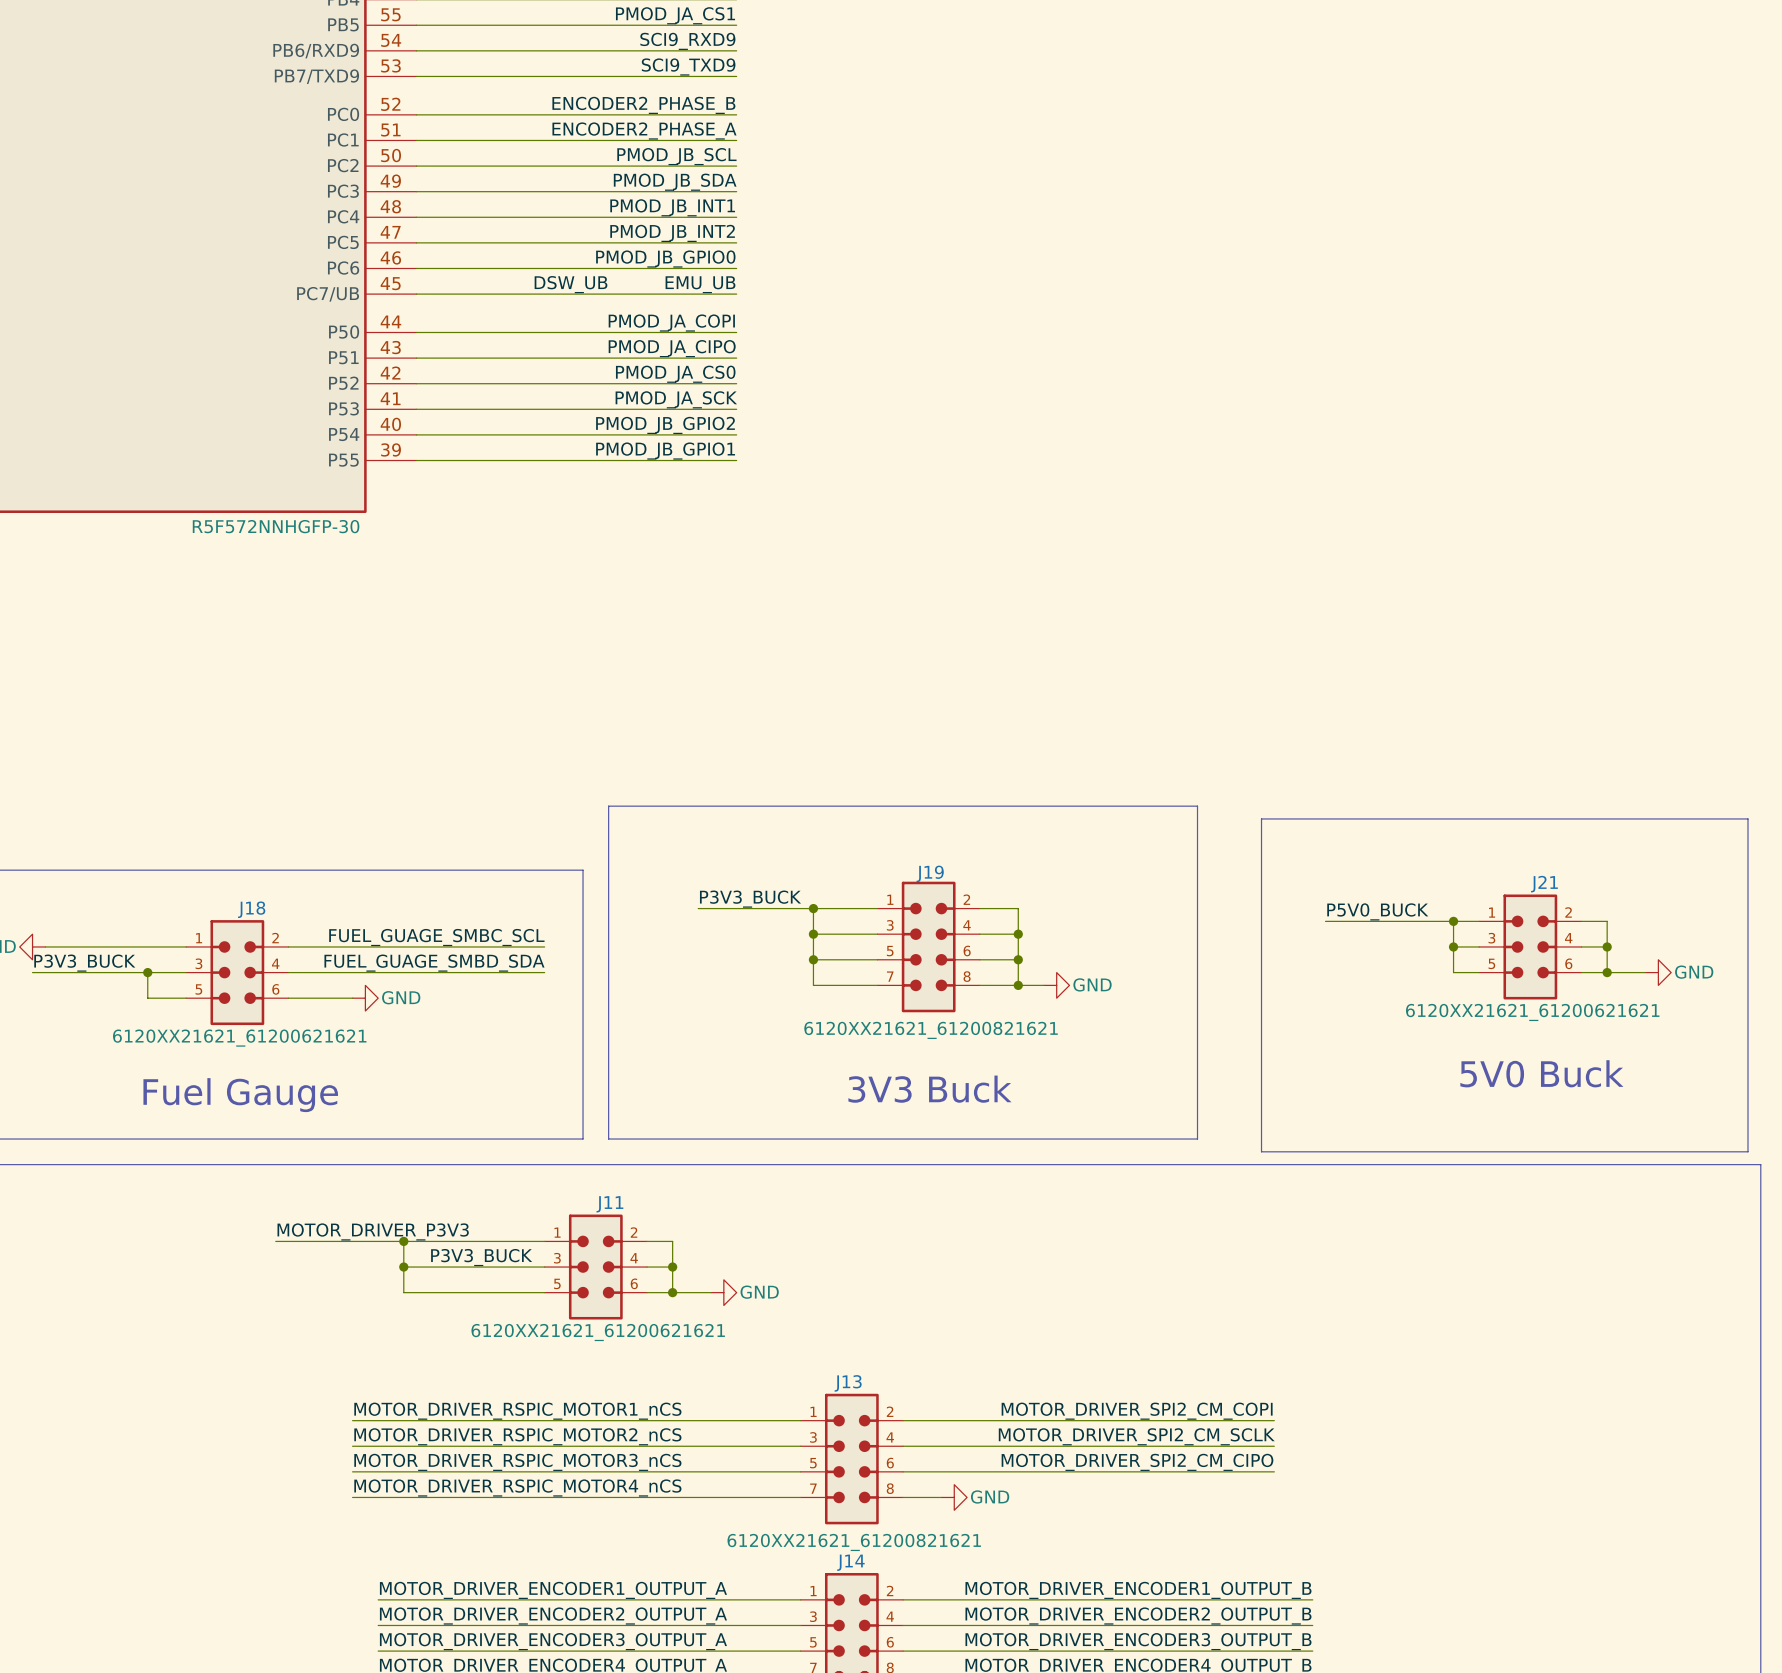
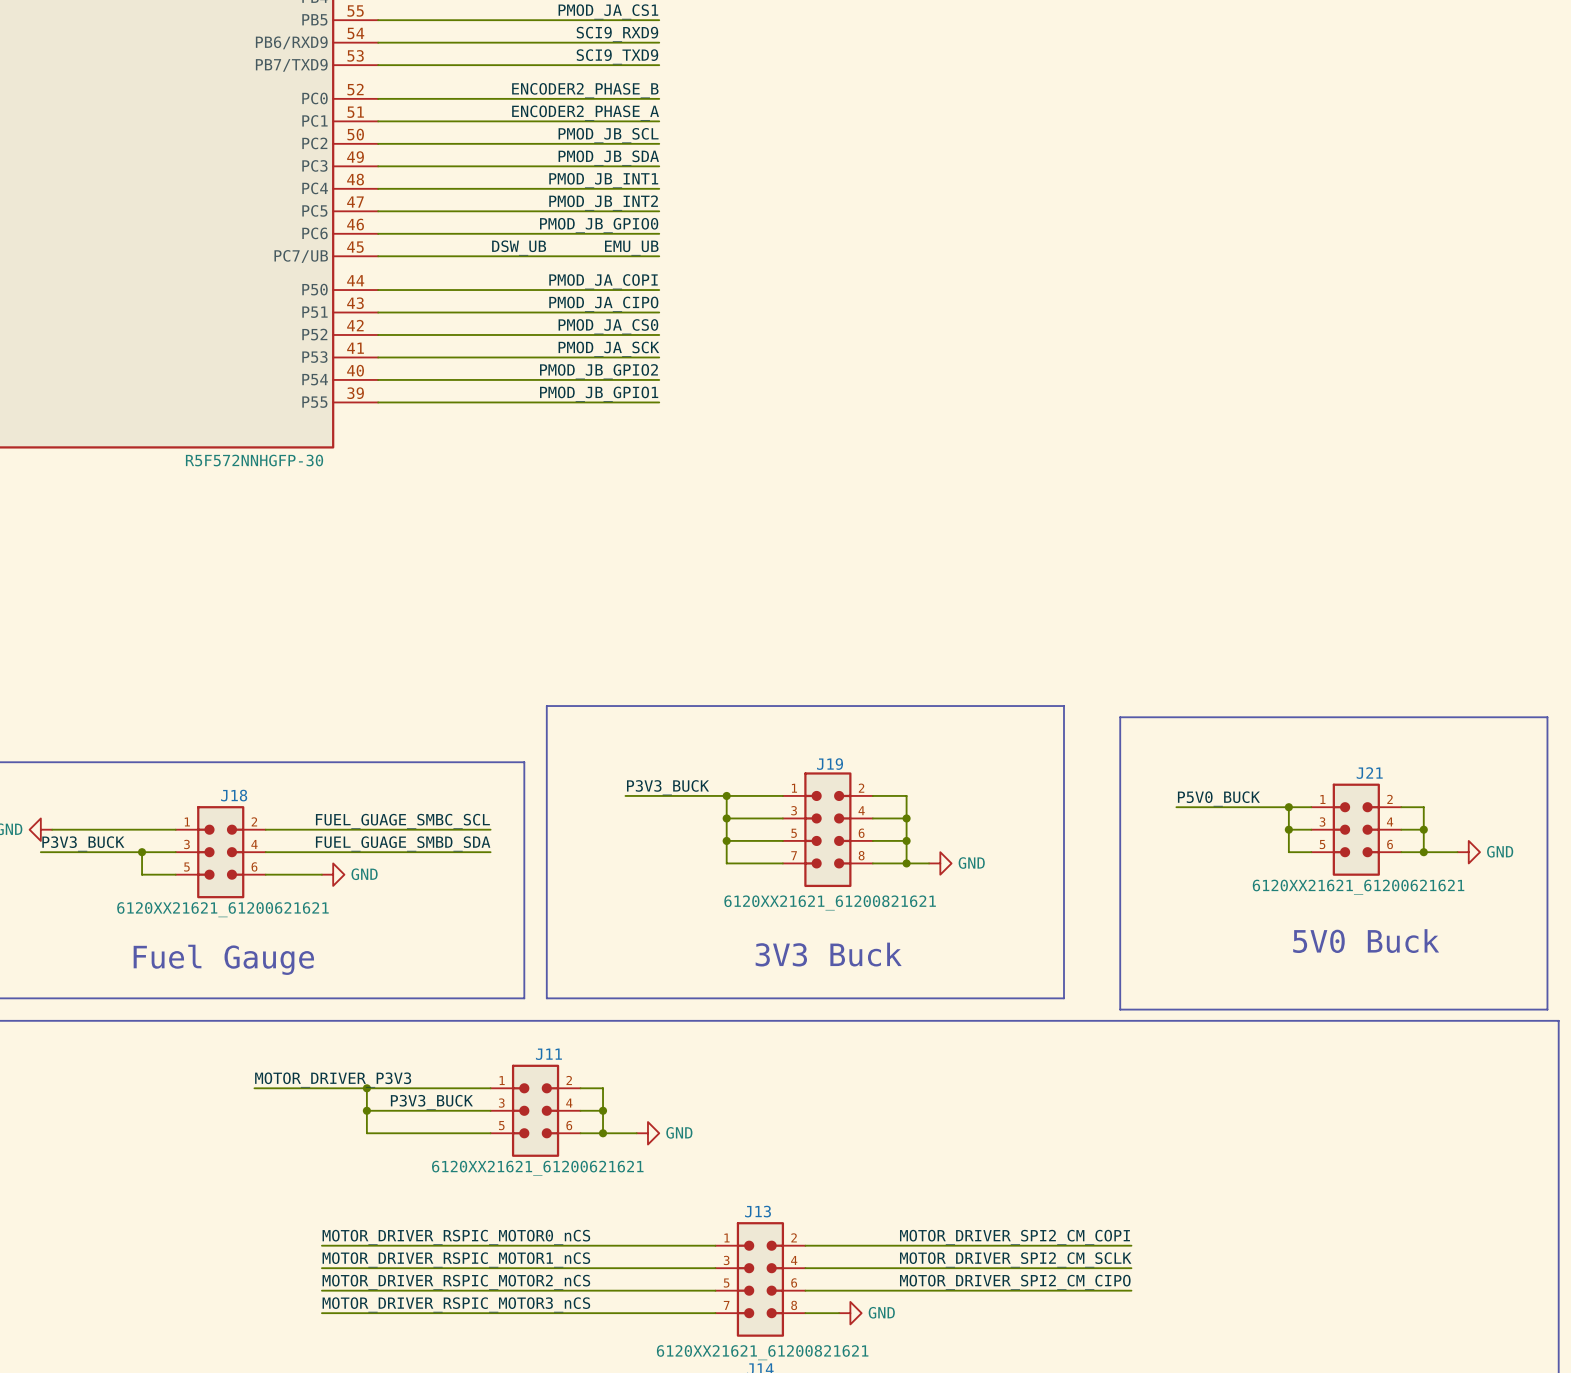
label: MOTOR_DRIVER_RSPIC_MOTOR1_nCS (517, 1411) -> MOTOR_DRIVER_RSPIC_MOTOR0_nCS (456, 1237)
label: MOTOR_DRIVER_RSPIC_MOTOR2_nCS (517, 1436) -> MOTOR_DRIVER_RSPIC_MOTOR1_nCS (456, 1259)
label: MOTOR_DRIVER_RSPIC_MOTOR3_nCS (517, 1462) -> MOTOR_DRIVER_RSPIC_MOTOR2_nCS (456, 1282)
label: MOTOR_DRIVER_RSPIC_MOTOR4_nCS (517, 1487) -> MOTOR_DRIVER_RSPIC_MOTOR3_nCS (456, 1304)

